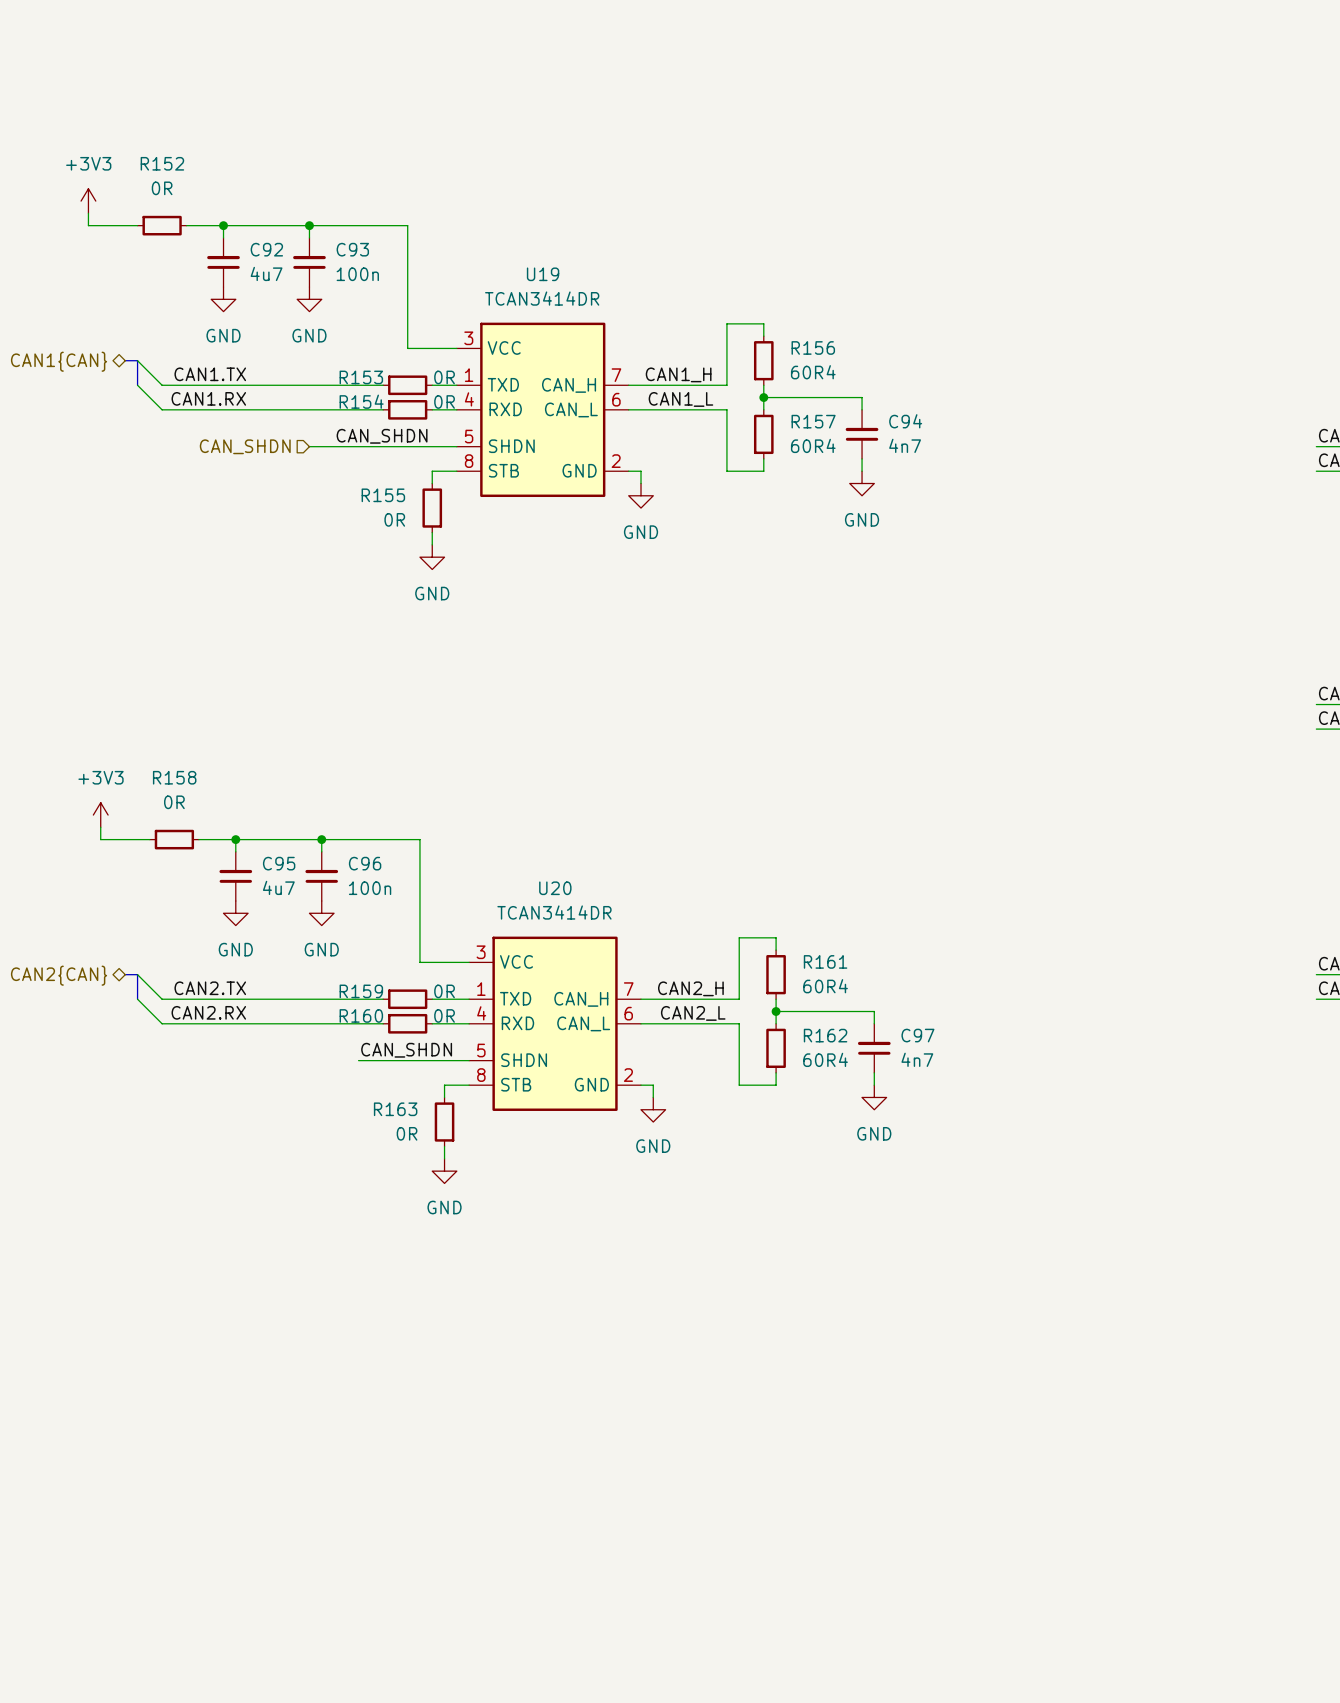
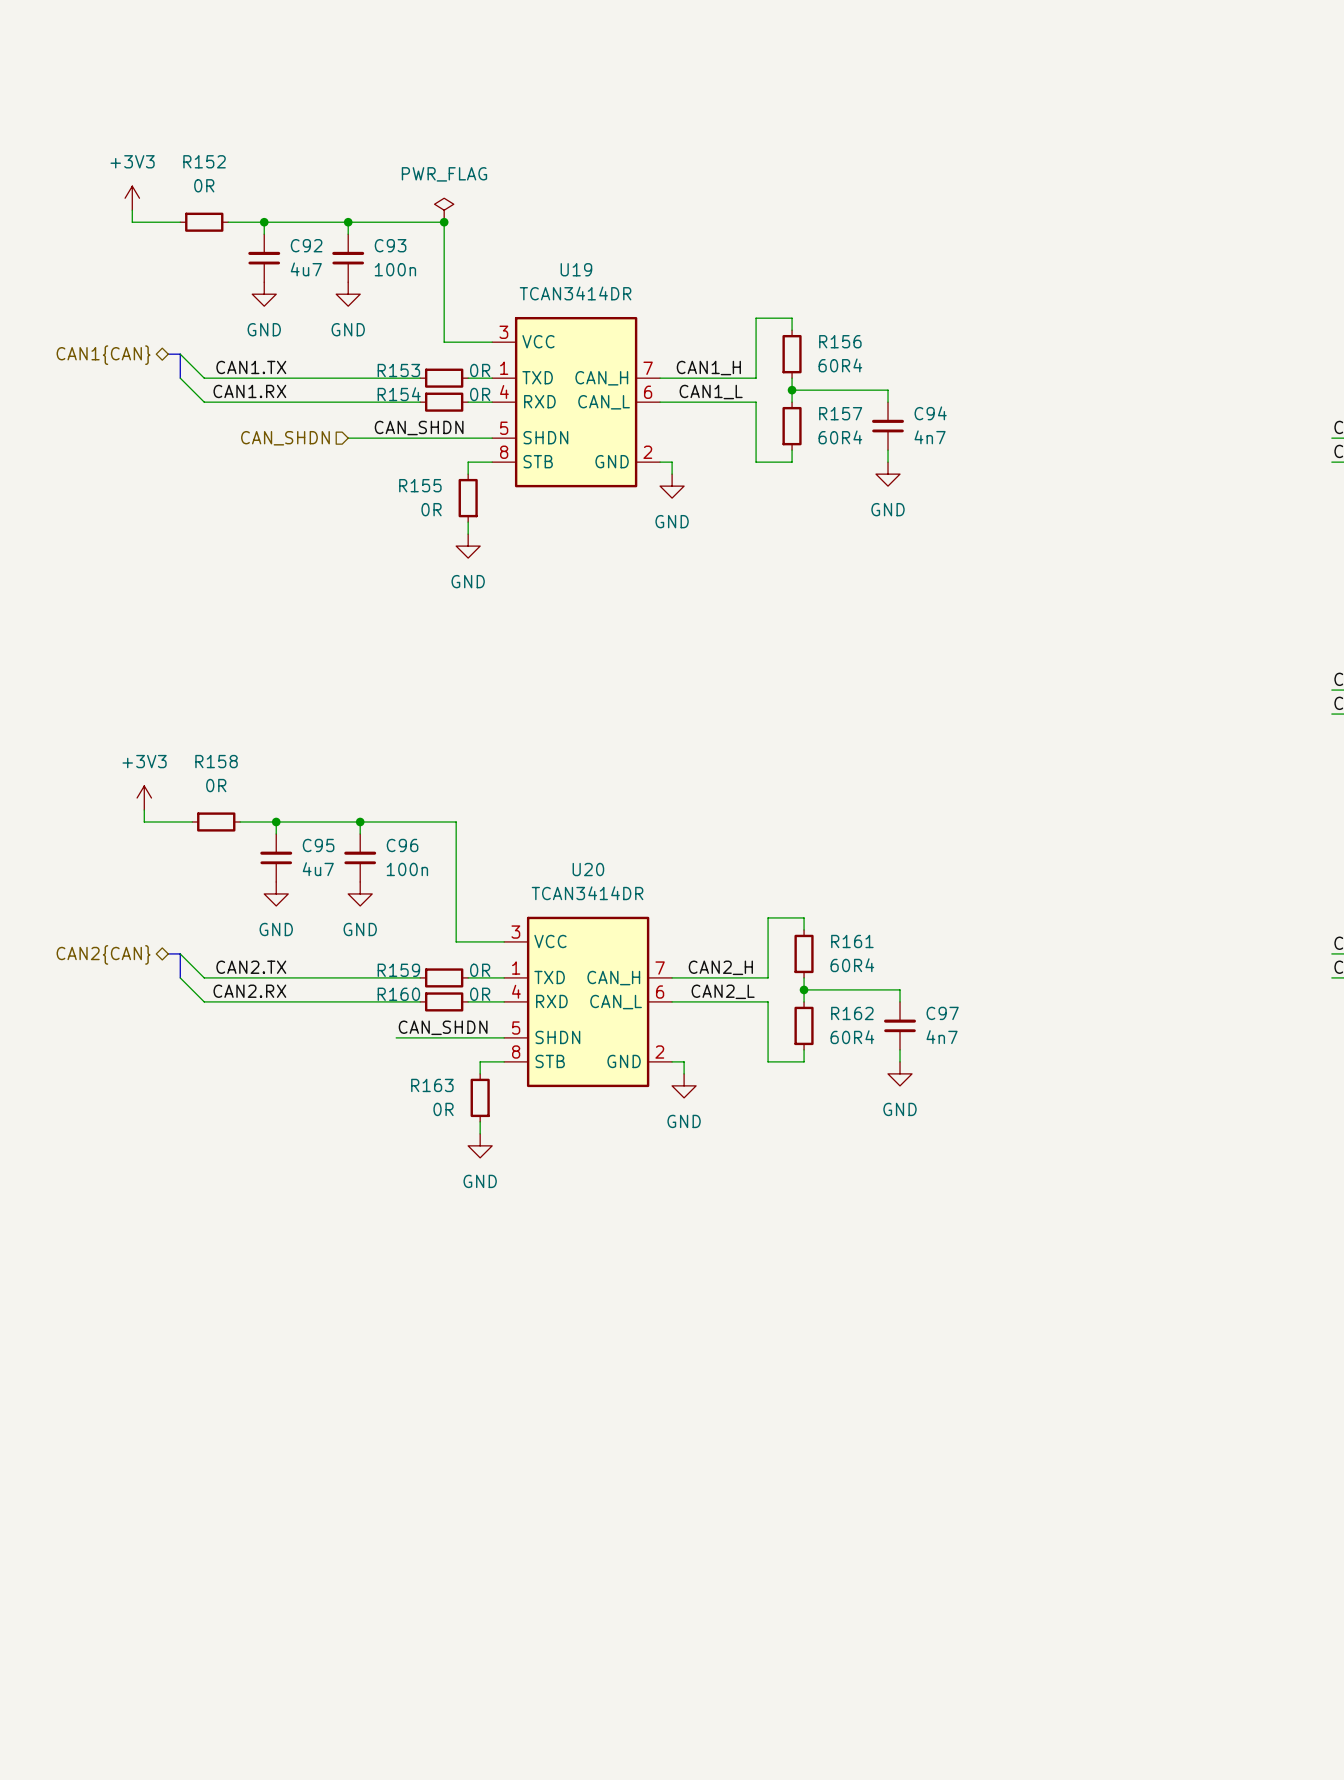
power symbol: none -> PWR_FLAG (444, 210)
junction: none -> (444, 222)

